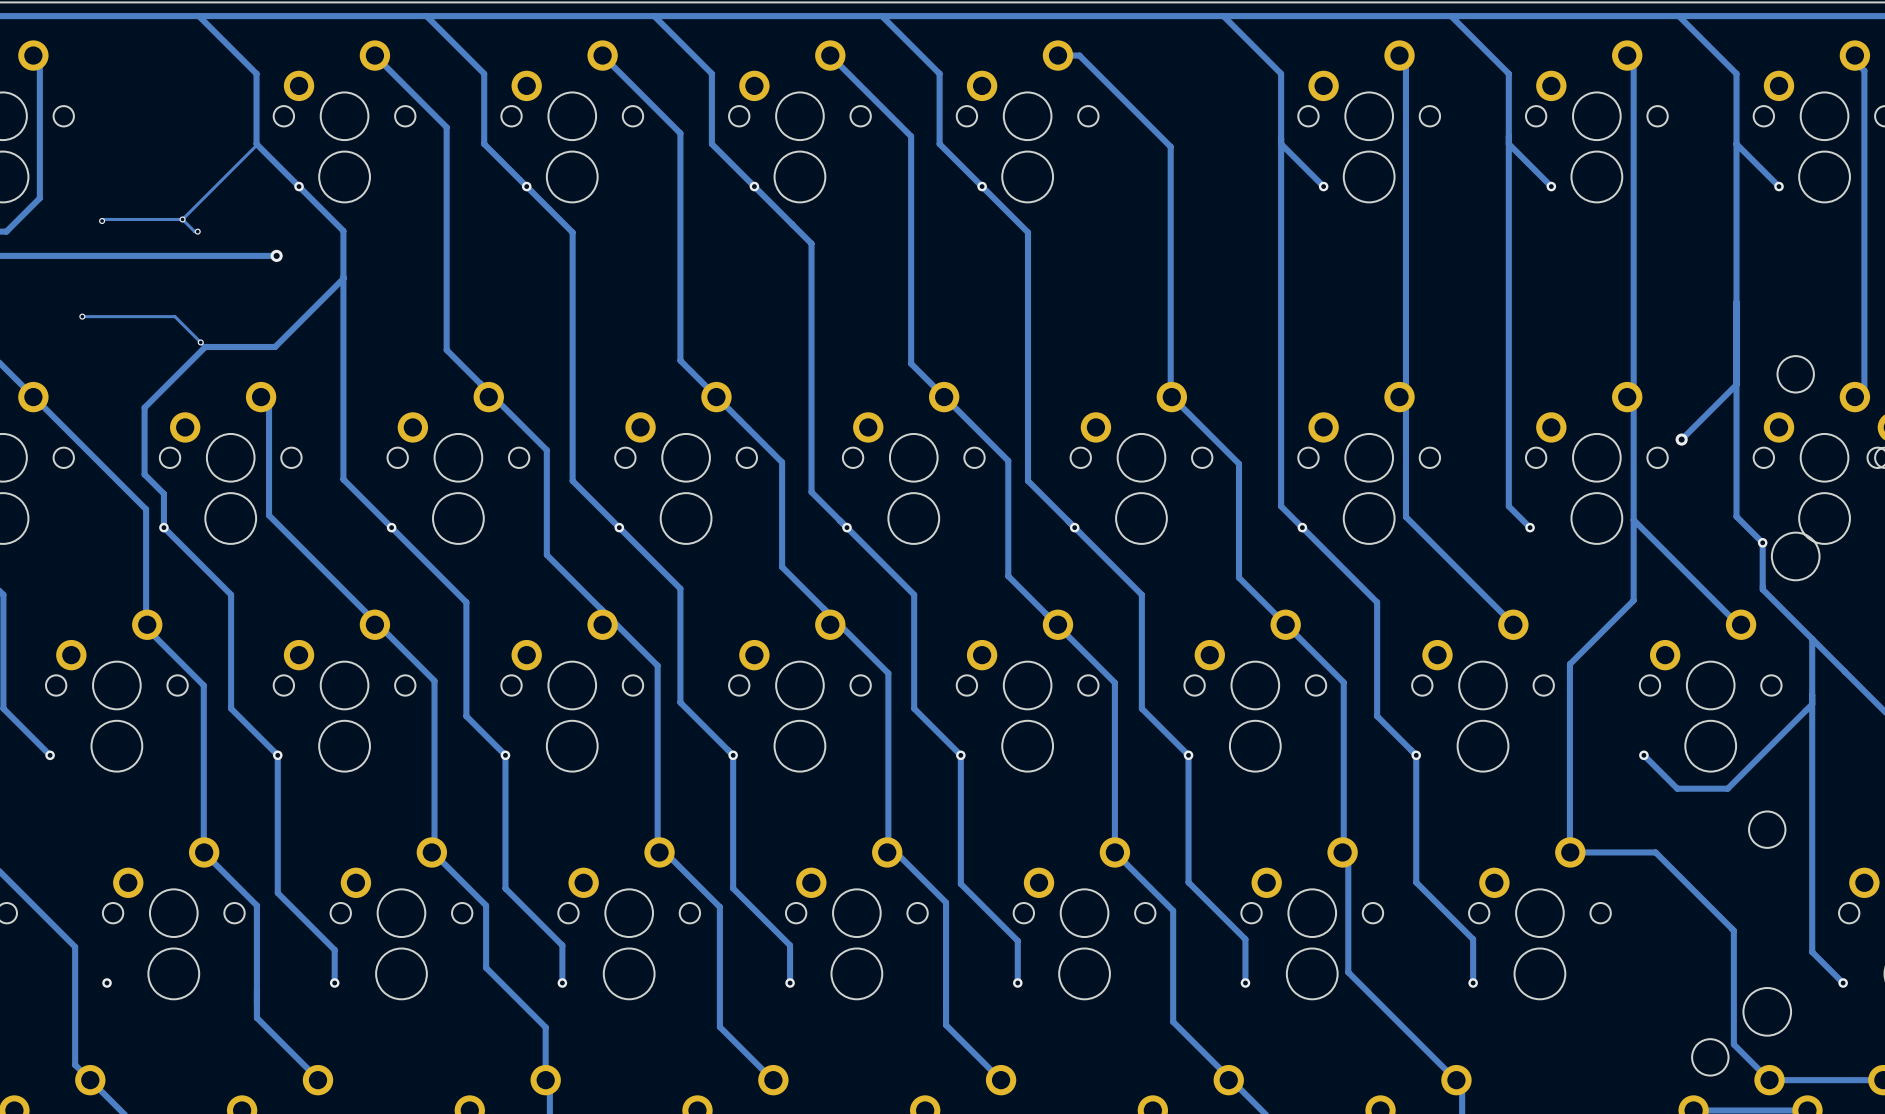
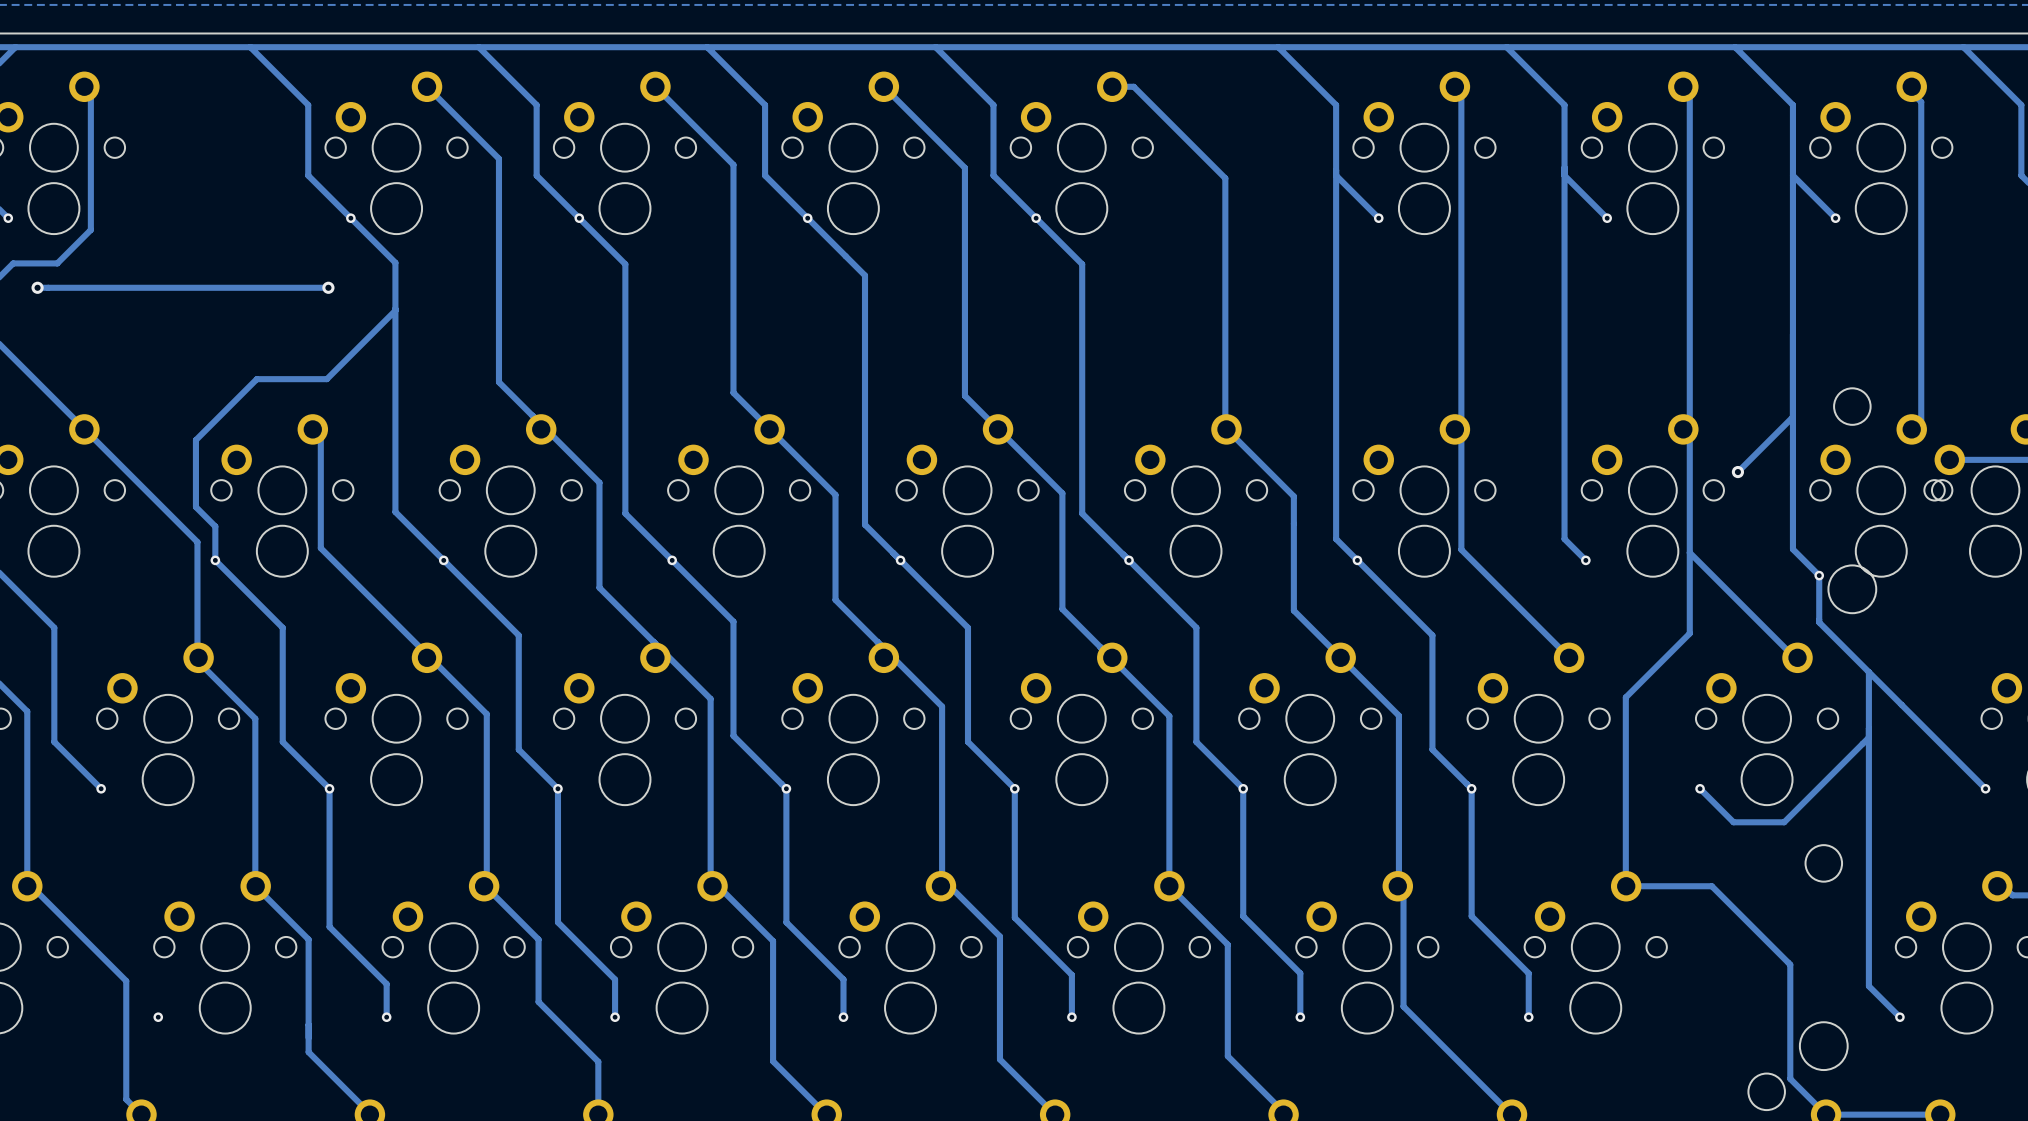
track: (256, 144) (182, 219) -> none
track: (182, 219) (194, 231) (197, 231) -> none
track: (182, 219) (102, 221) -> none
via: (182, 219) -> none
via: (102, 221) -> none
via: (197, 231) -> none
track: (82, 316) (174, 316) (205, 346) -> none
via: (82, 316) -> none
via: (200, 342) -> none

